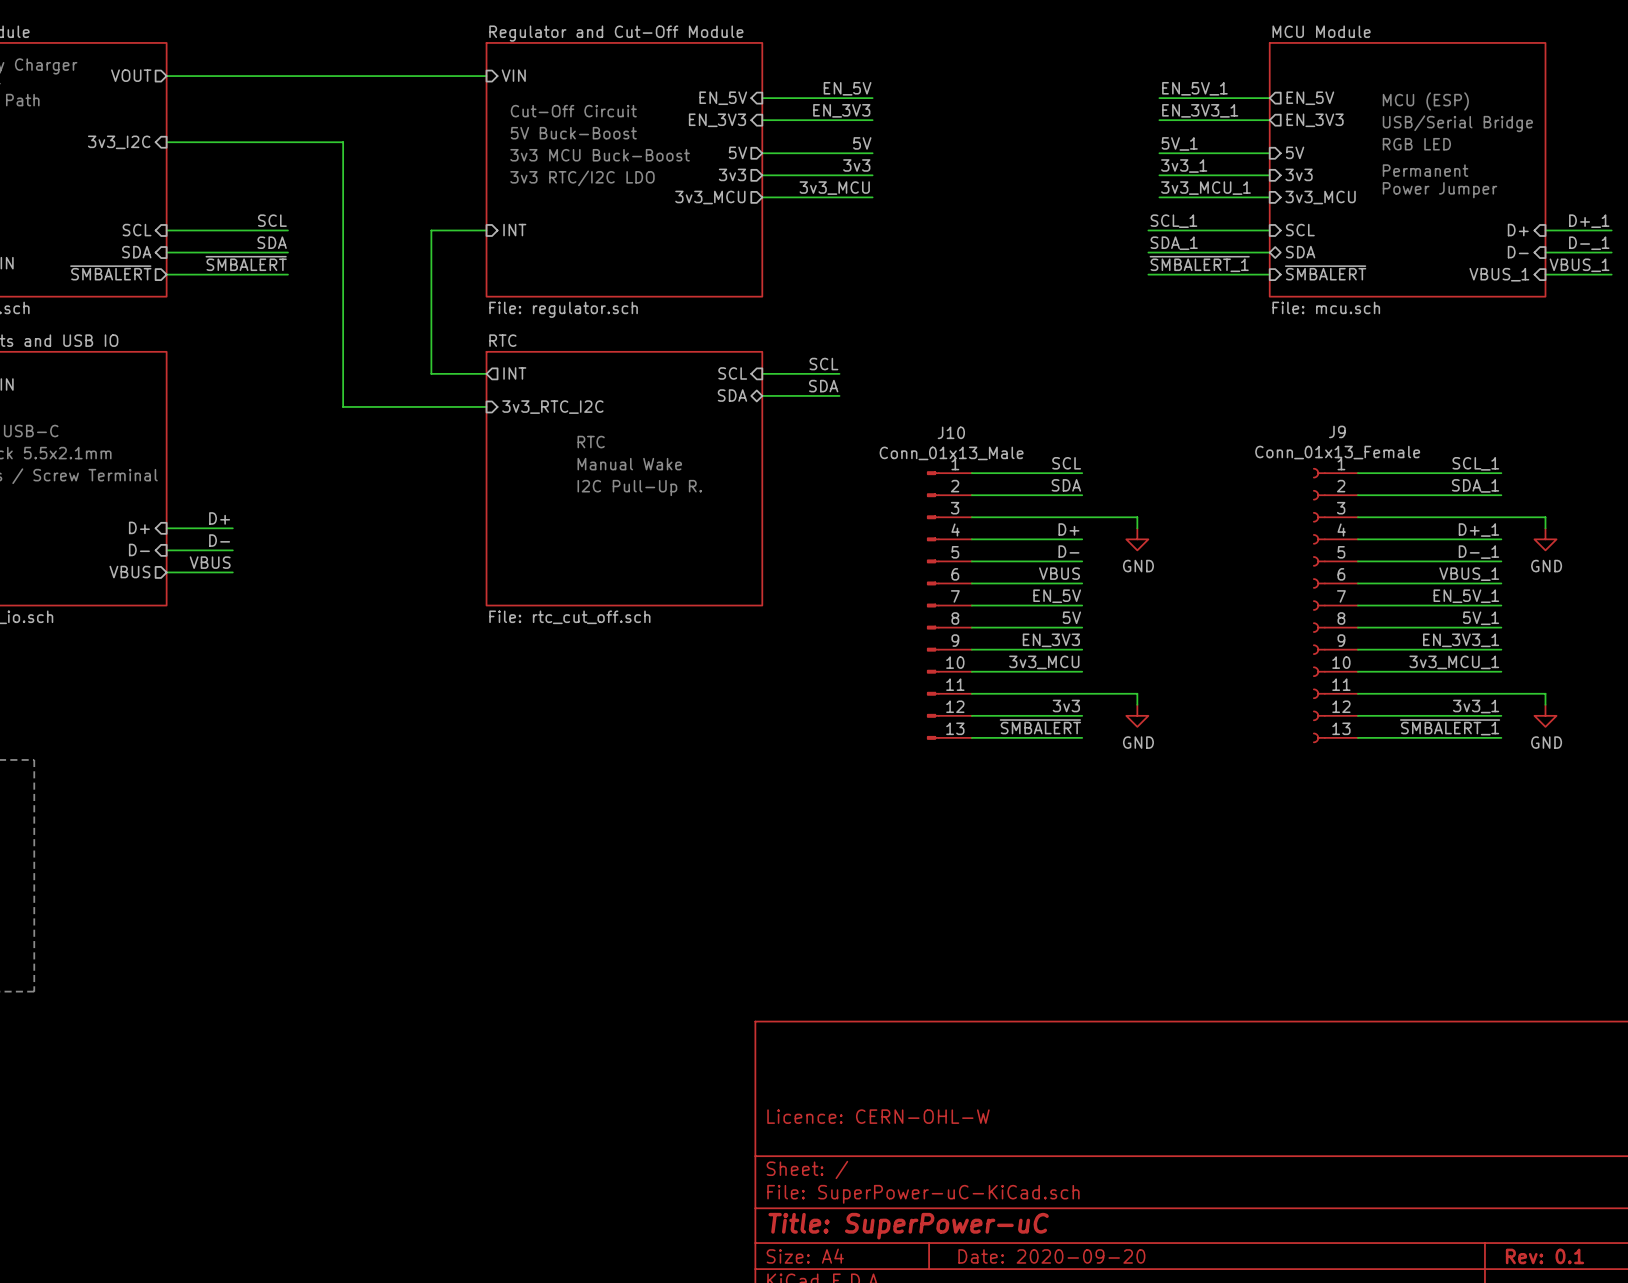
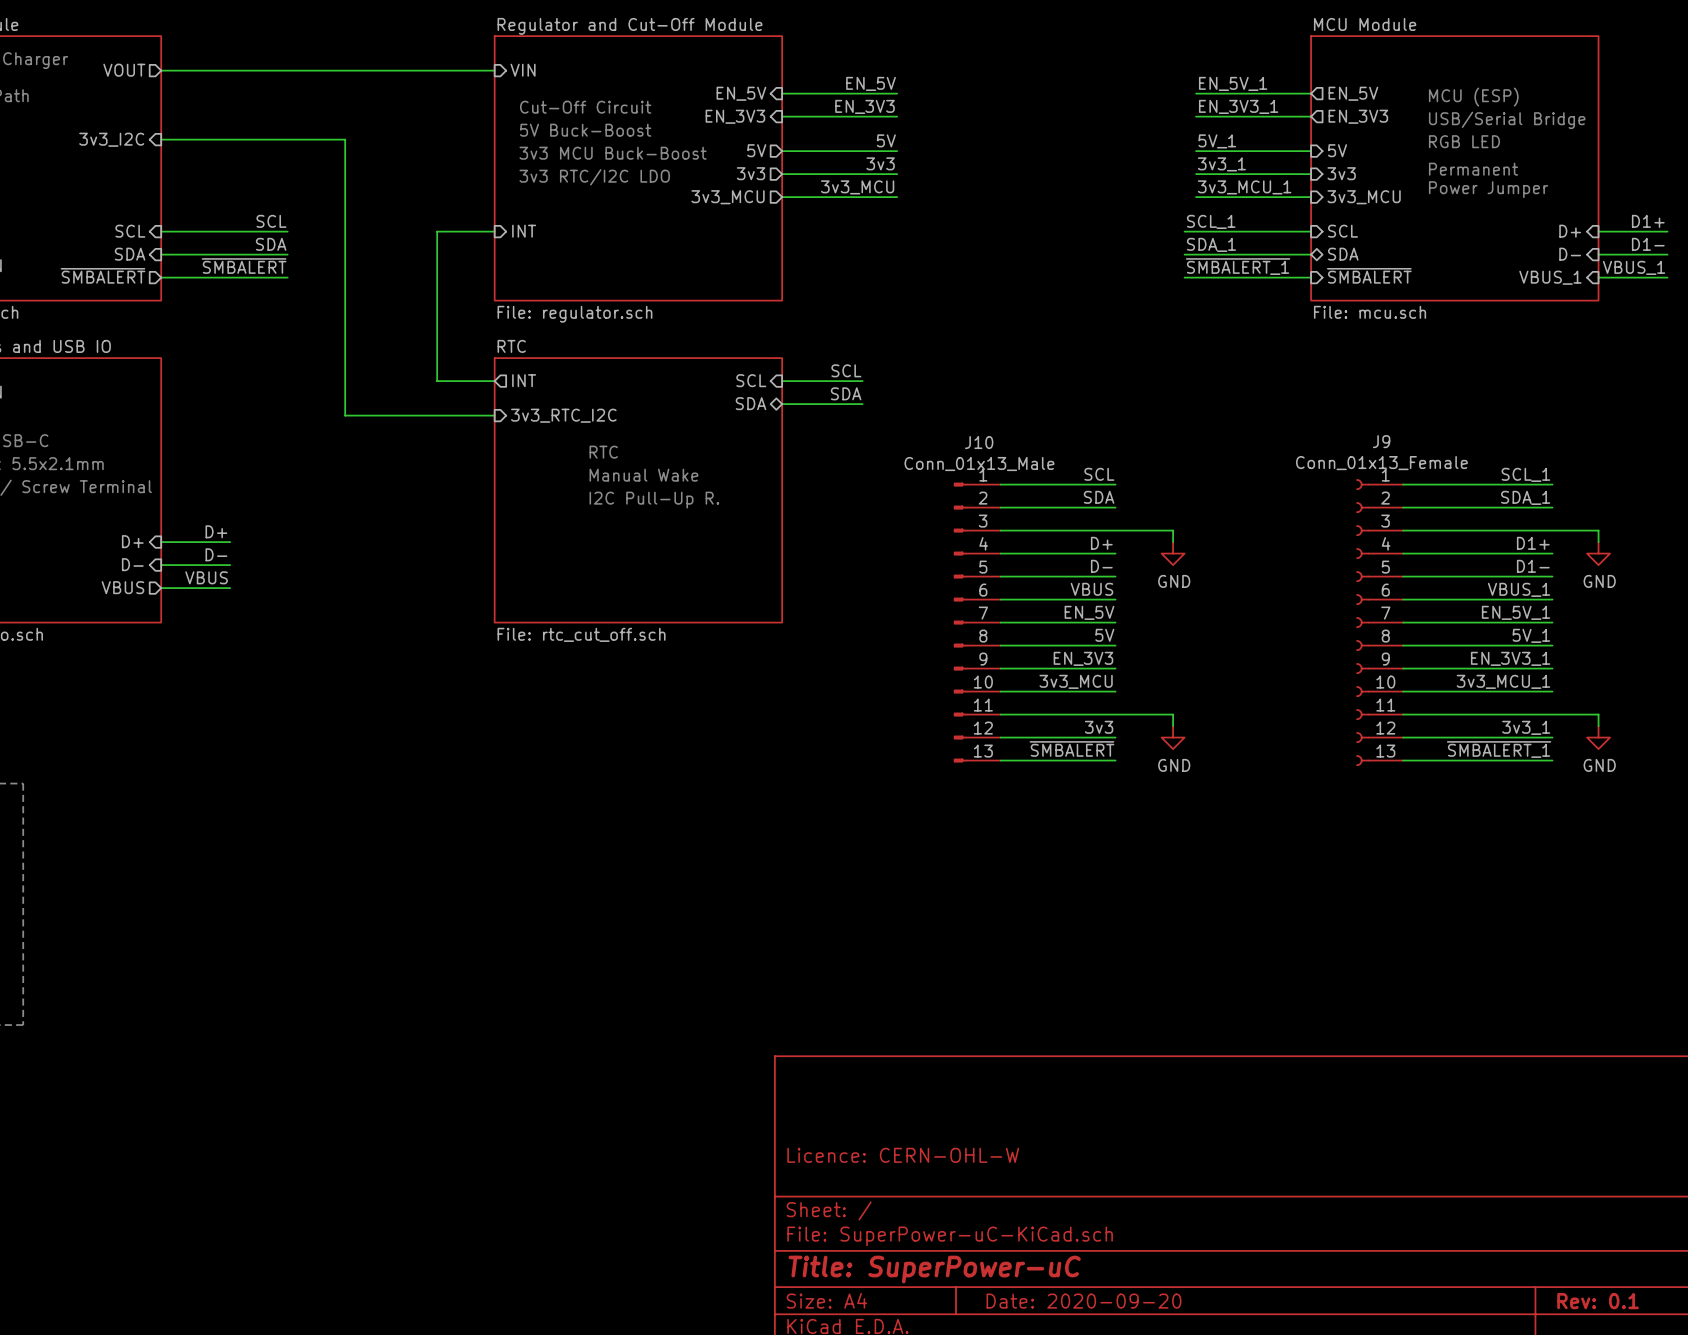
label: D+_1 (1589, 221) -> D1+ (1648, 221)
label: D-_1 (1589, 243) -> D1- (1648, 244)
label: D+_1 (1478, 530) -> D1+ (1533, 543)
label: D-_1 (1478, 552) -> D1- (1533, 566)

